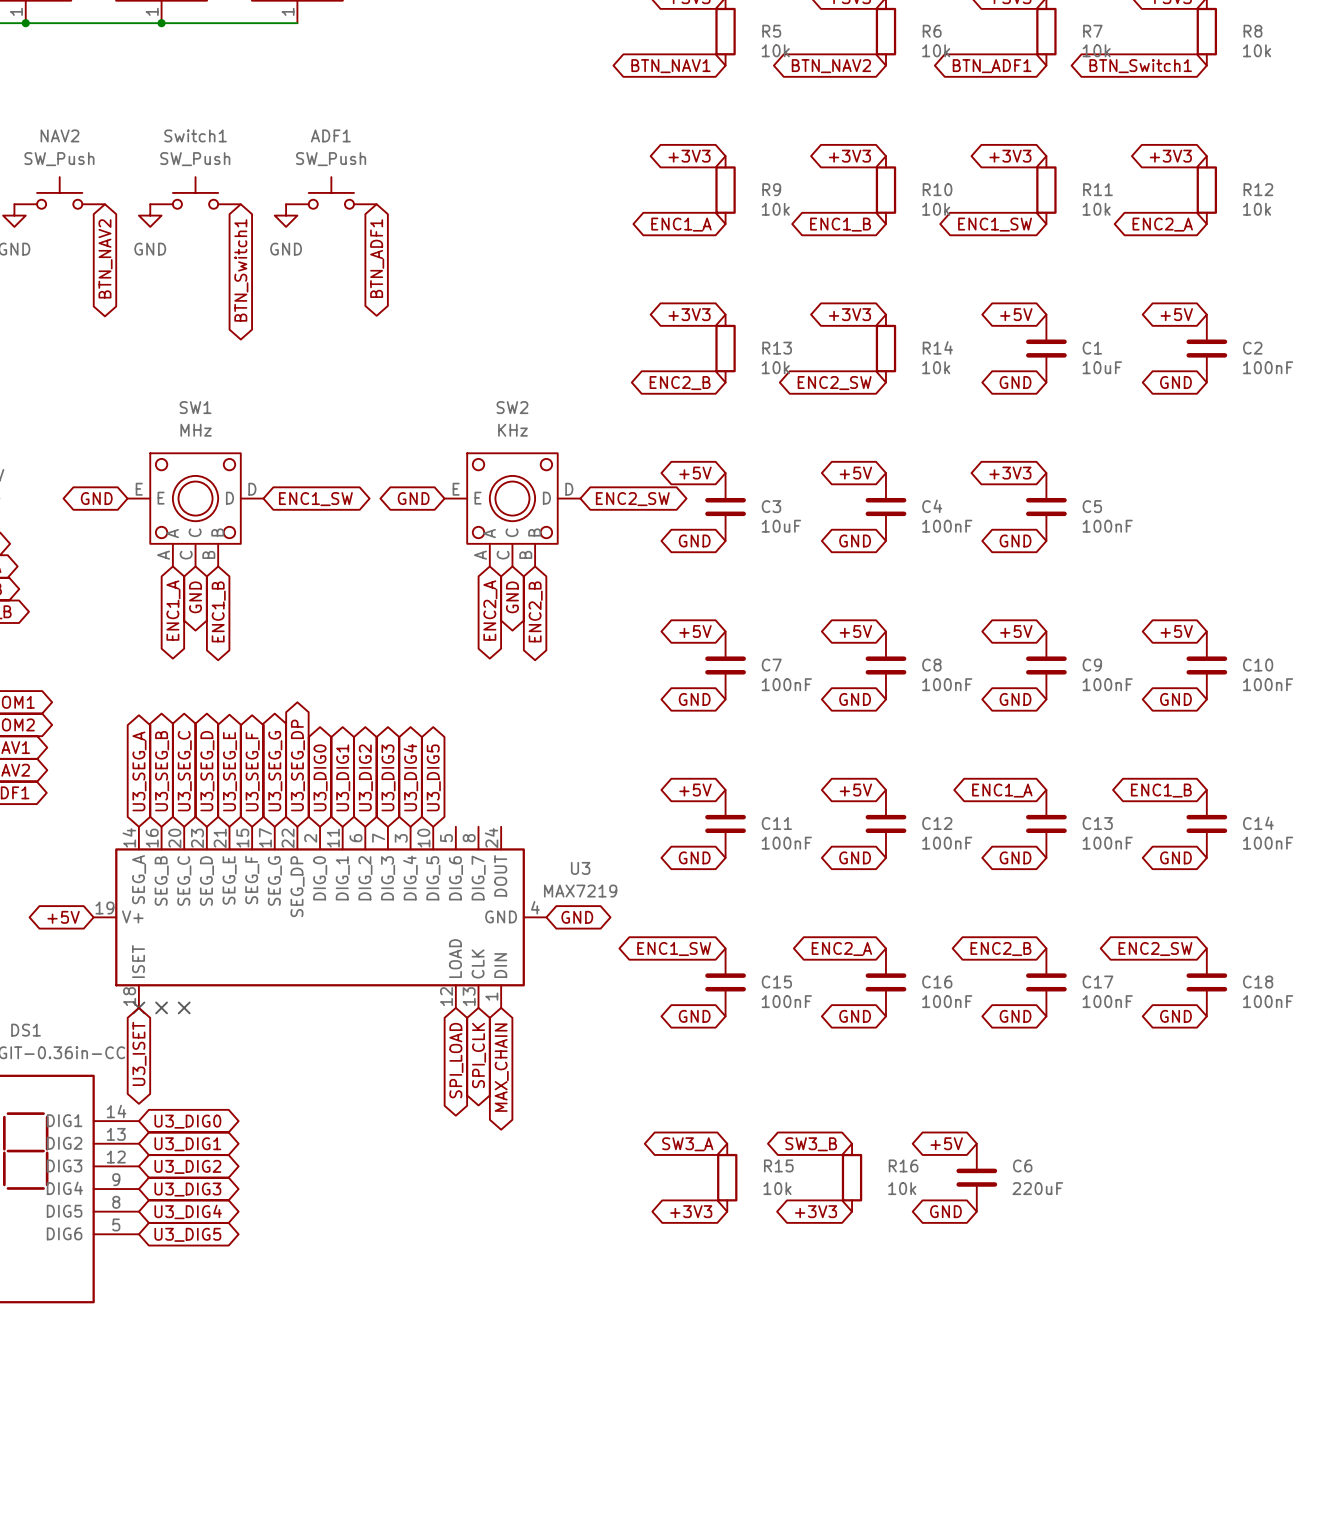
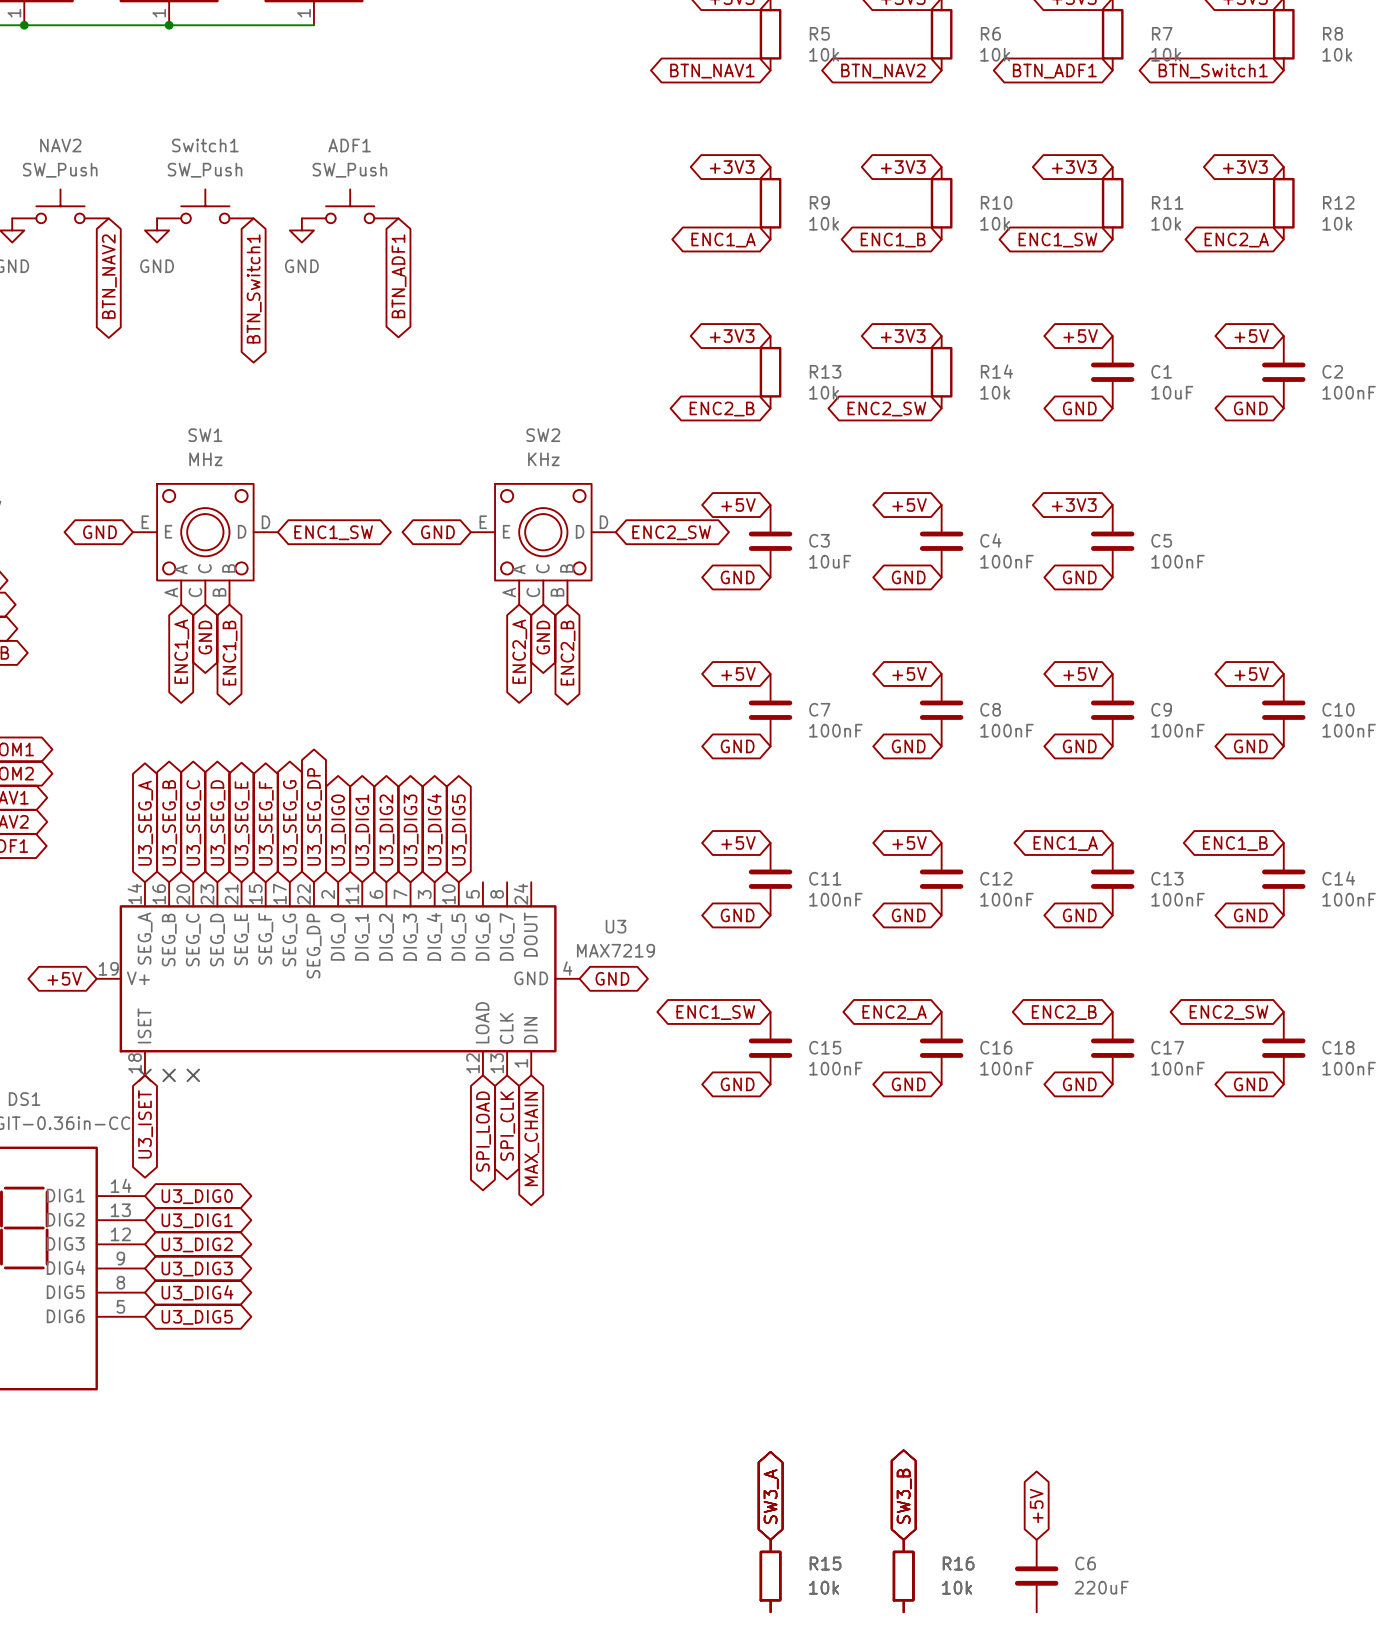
global label: +5V (946, 1143) -> none
global label: SW3_A (687, 1144) -> none
global label: SW3_B (811, 1144) -> none
R15: 10k (727, 1177) -> none
R16: 10k (852, 1177) -> none
C6 position: (976, 1177) -> (1036, 1576)
global label: +3V3 (691, 1211) -> none
global label: +3V3 (816, 1211) -> none
global label: GND (945, 1211) -> none
global label: none -> SW3_A (771, 1496)
global label: none -> SW3_B (904, 1496)
global label: none -> +5V (1036, 1506)
R15: none -> 10k (770, 1576)
R16: none -> 10k (903, 1576)

